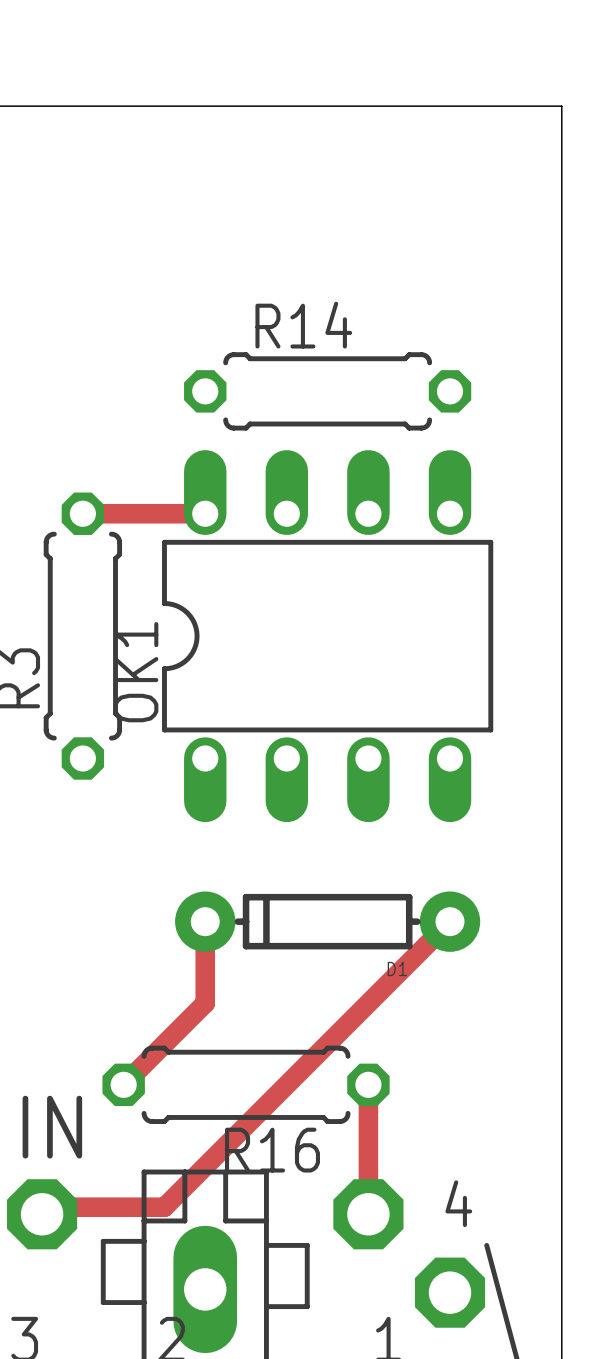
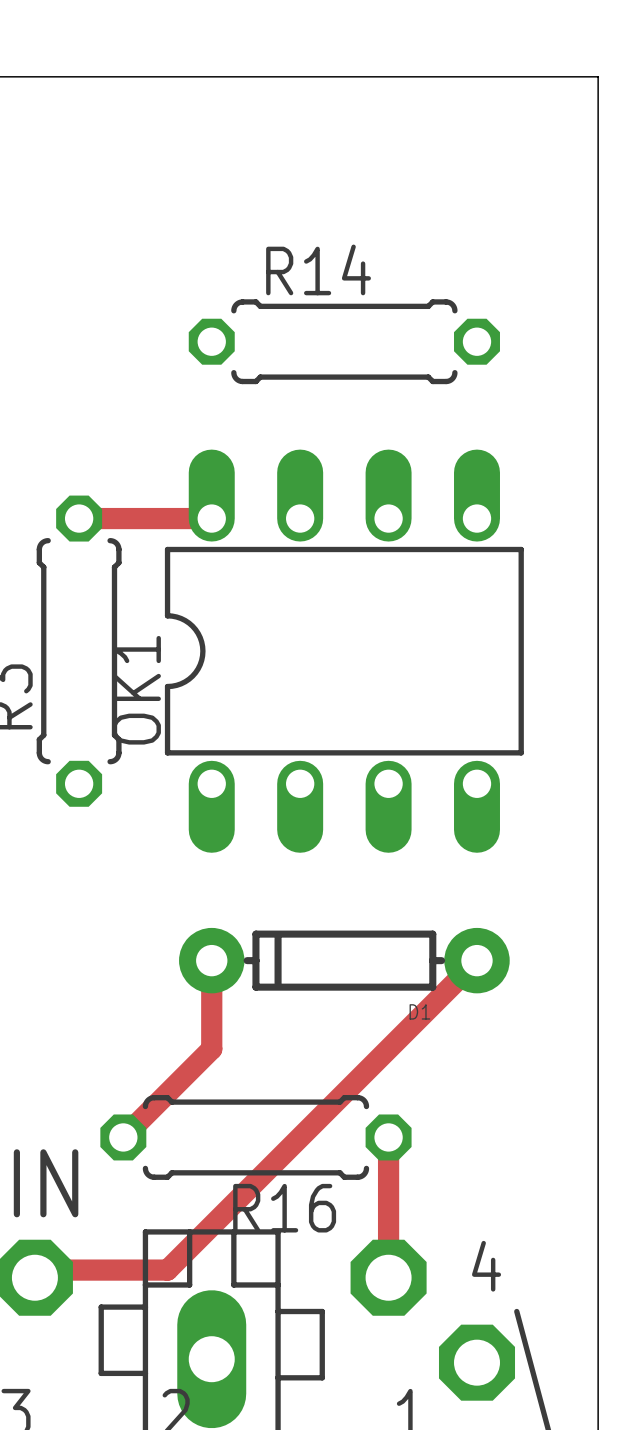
R14 position: (327, 391) -> (344, 341)

